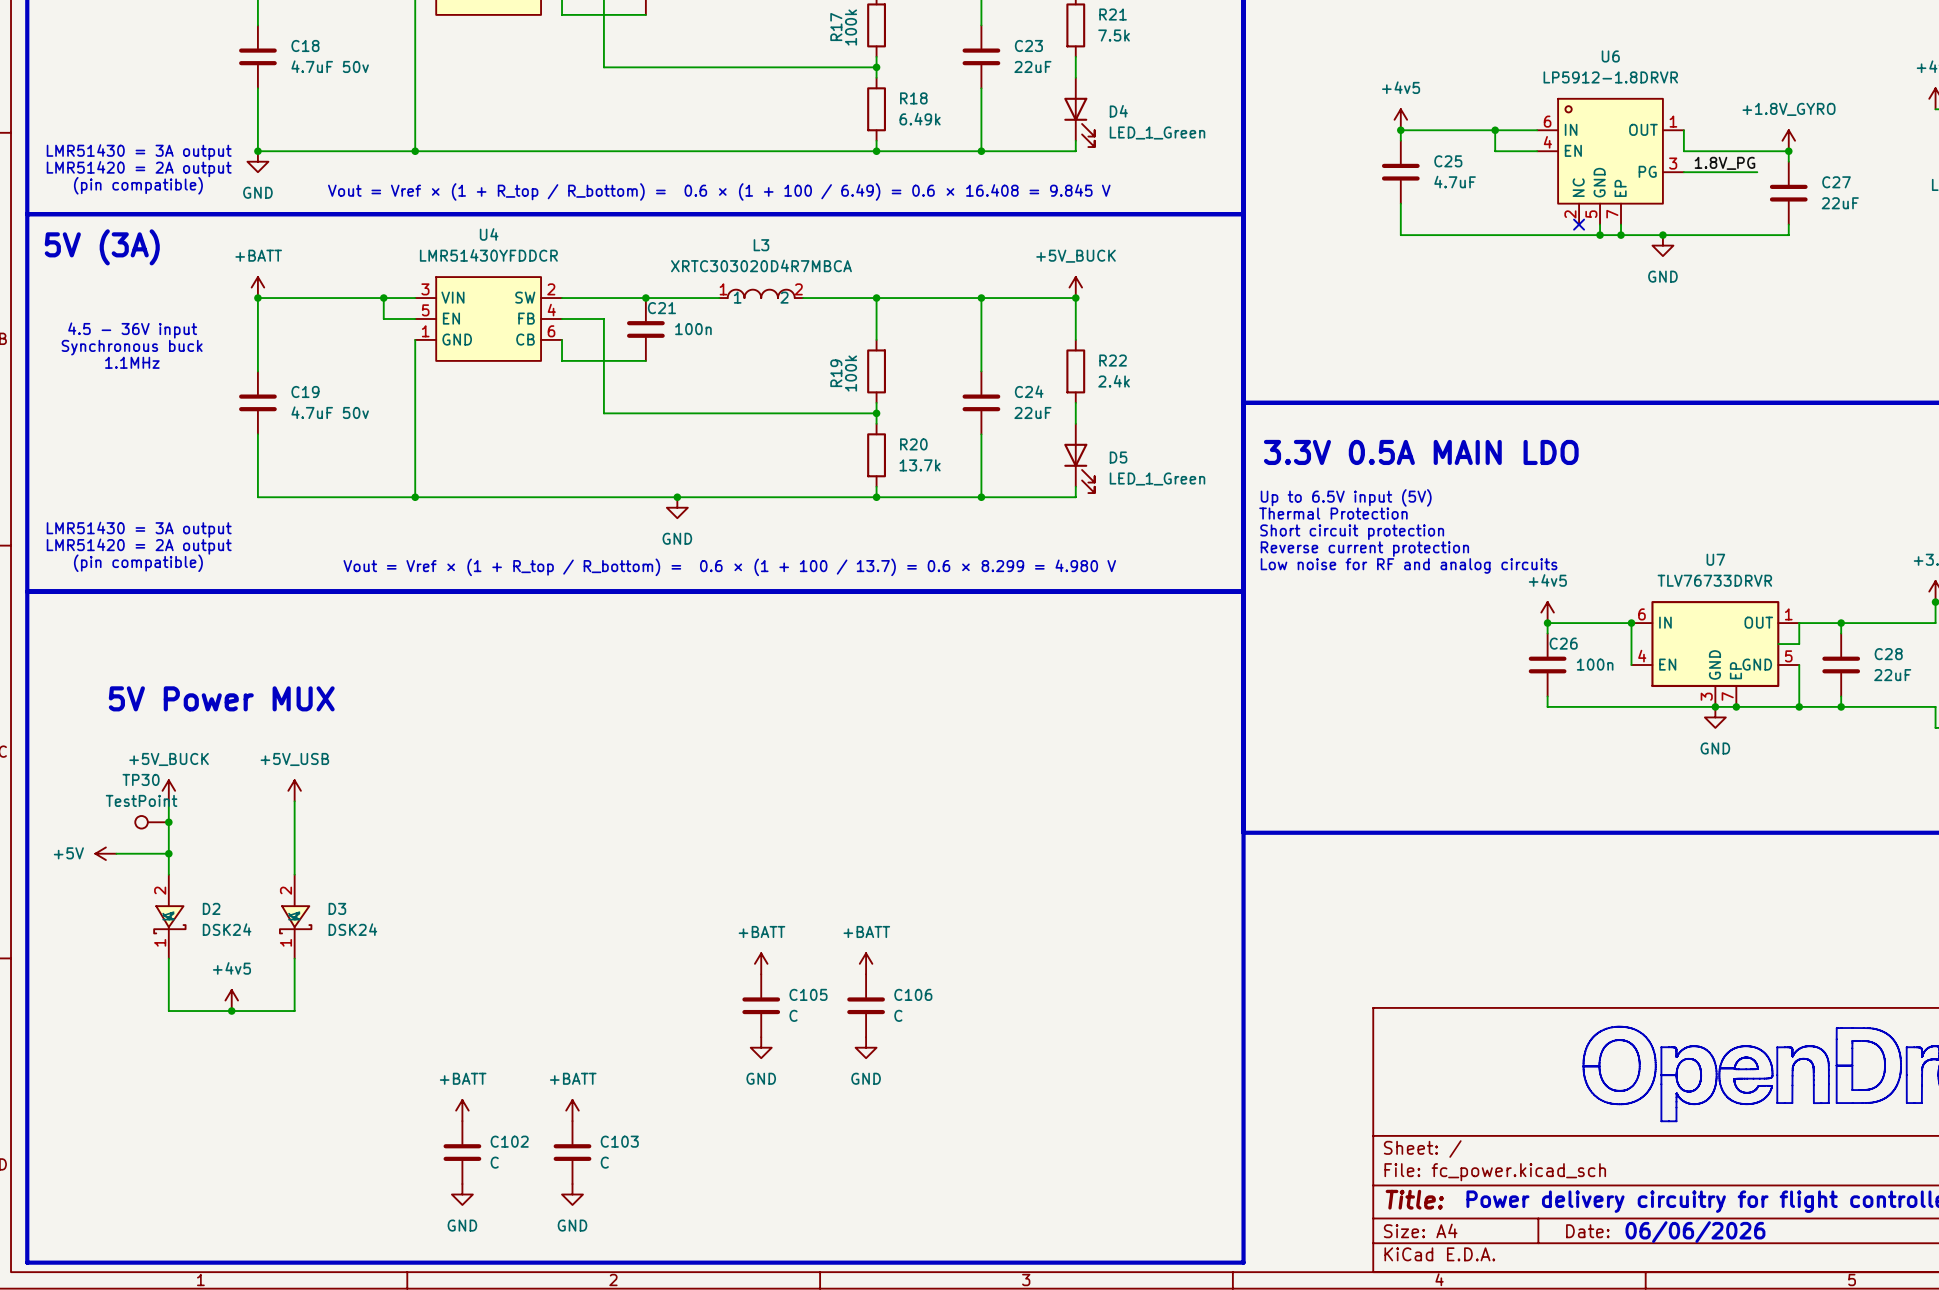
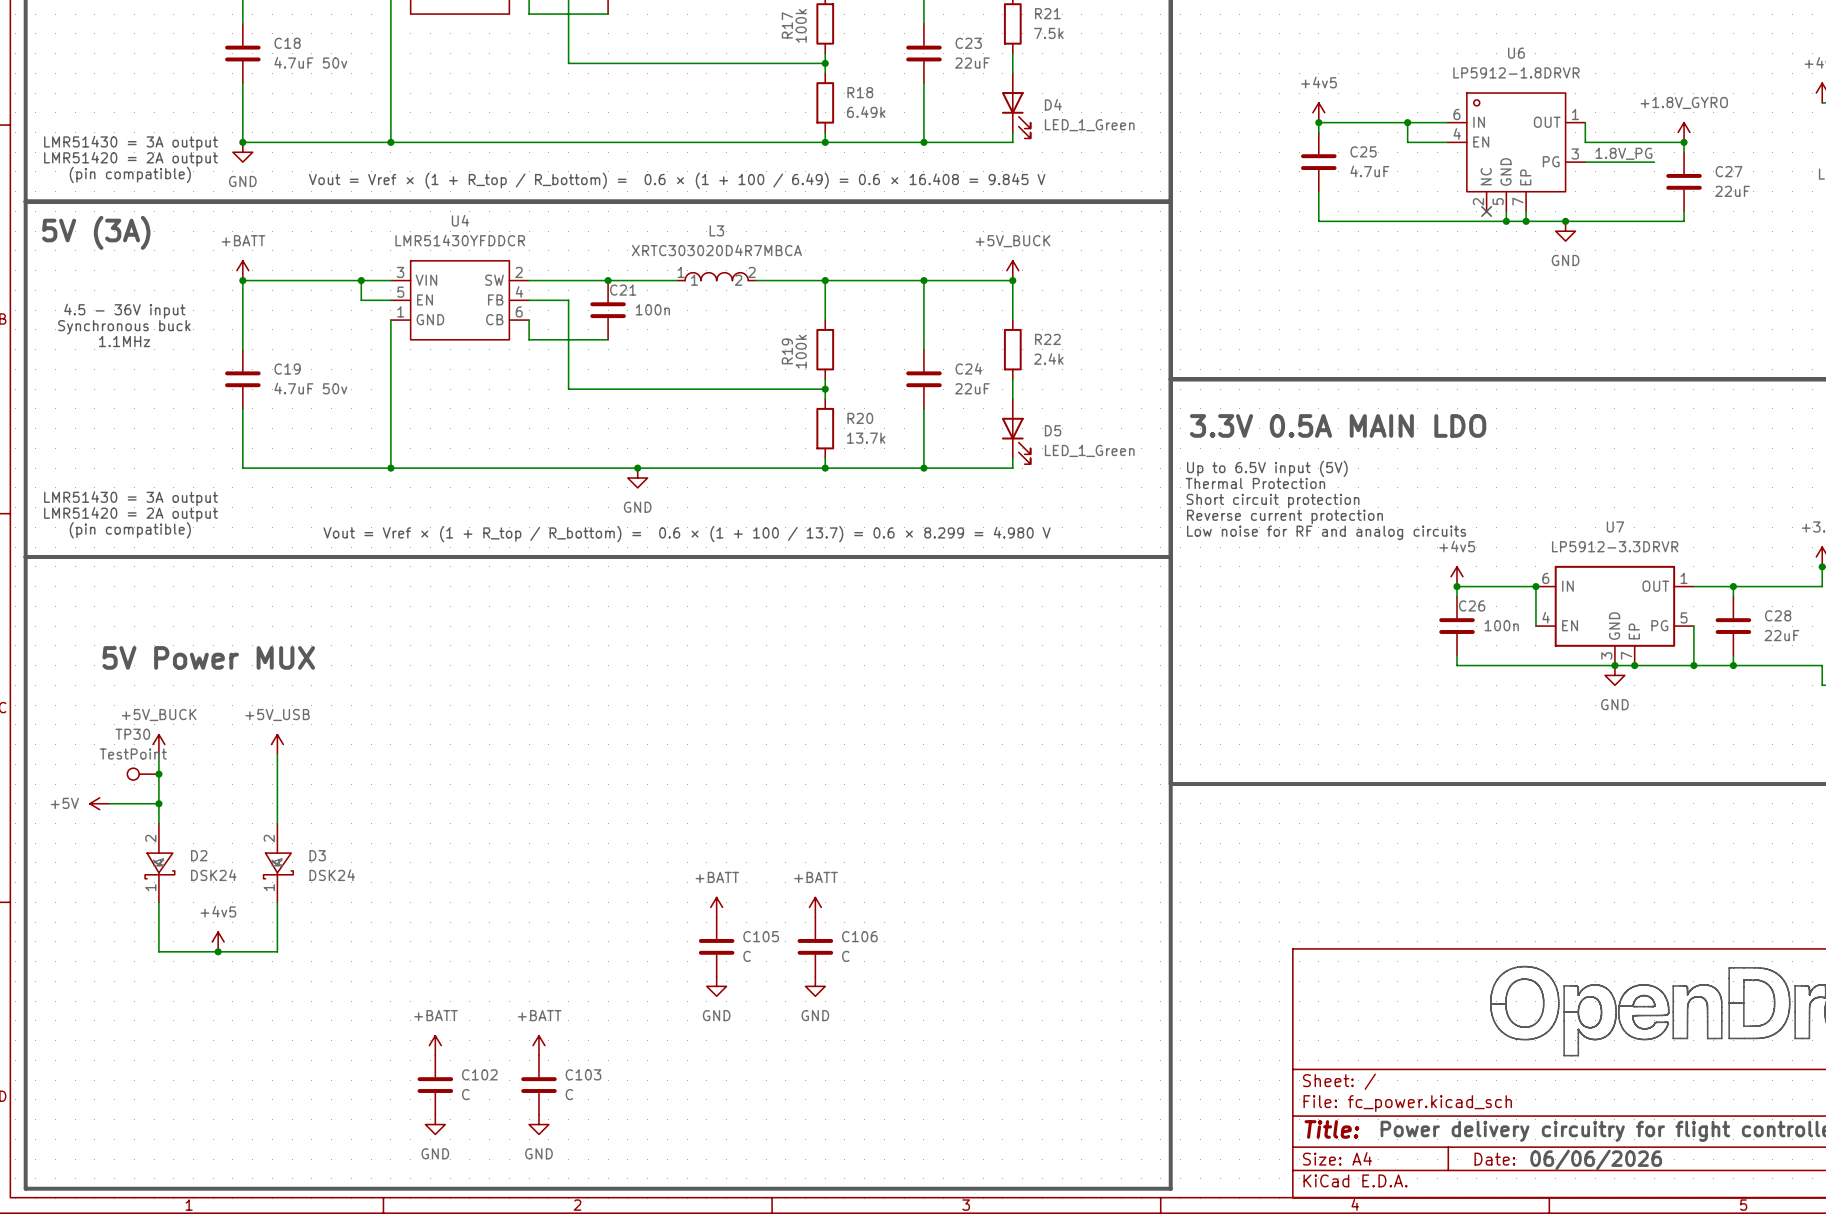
U7 value: TLV76733DRVR (1714, 580) -> LP5912-3.3DRVR (1615, 546)
wire: (1799, 623) (1799, 644) (1778, 644) -> none
U7 pin name: GND (1757, 664) -> PG (1659, 625)

